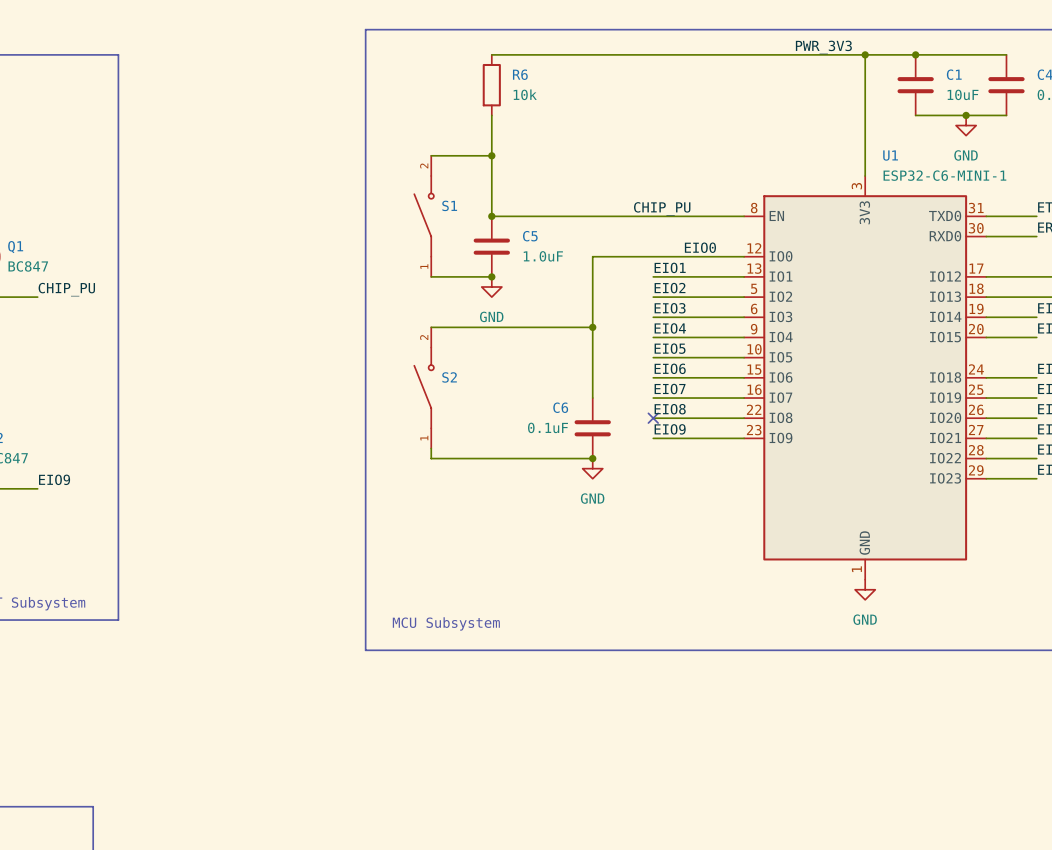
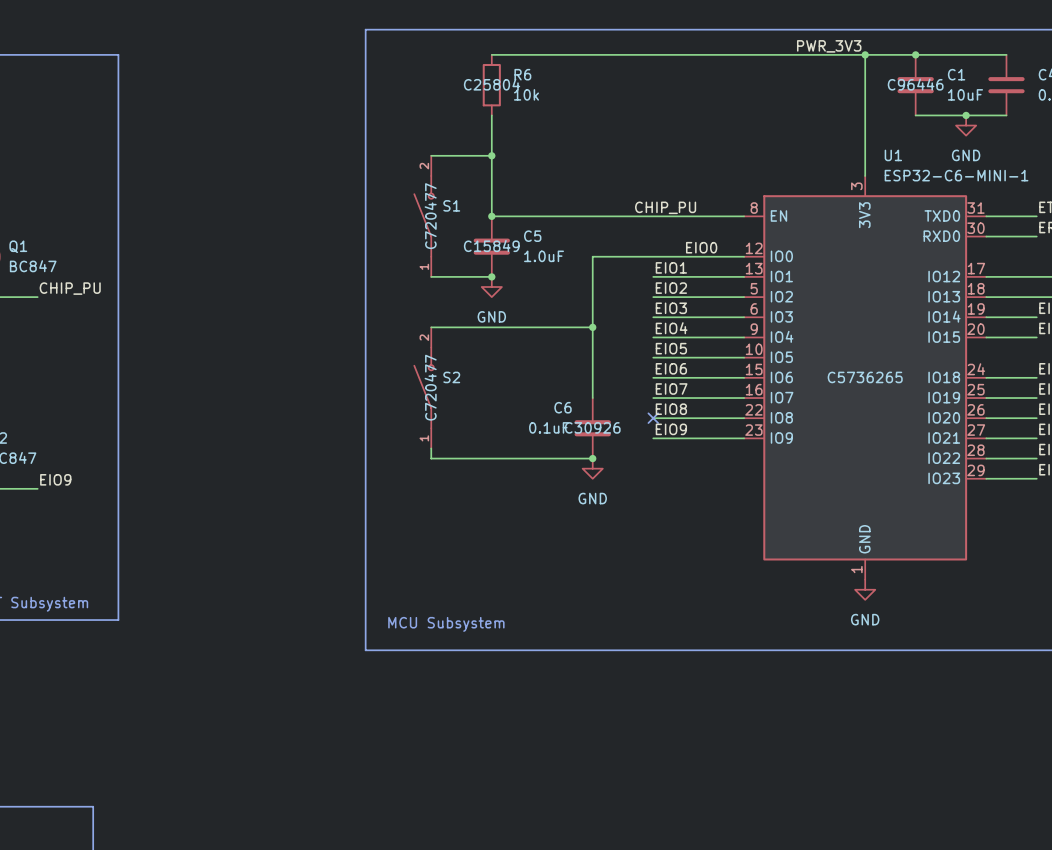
R6 text: none -> C25804 (492, 84)
C1 text: none -> C96446 (915, 84)
S1 text: none -> C720477 (430, 216)
C5 text: none -> C15849 (491, 246)
U1 text: none -> C5736265 (865, 377)
S2 text: none -> C720477 (430, 387)
C6 text: none -> C30926 (592, 427)

